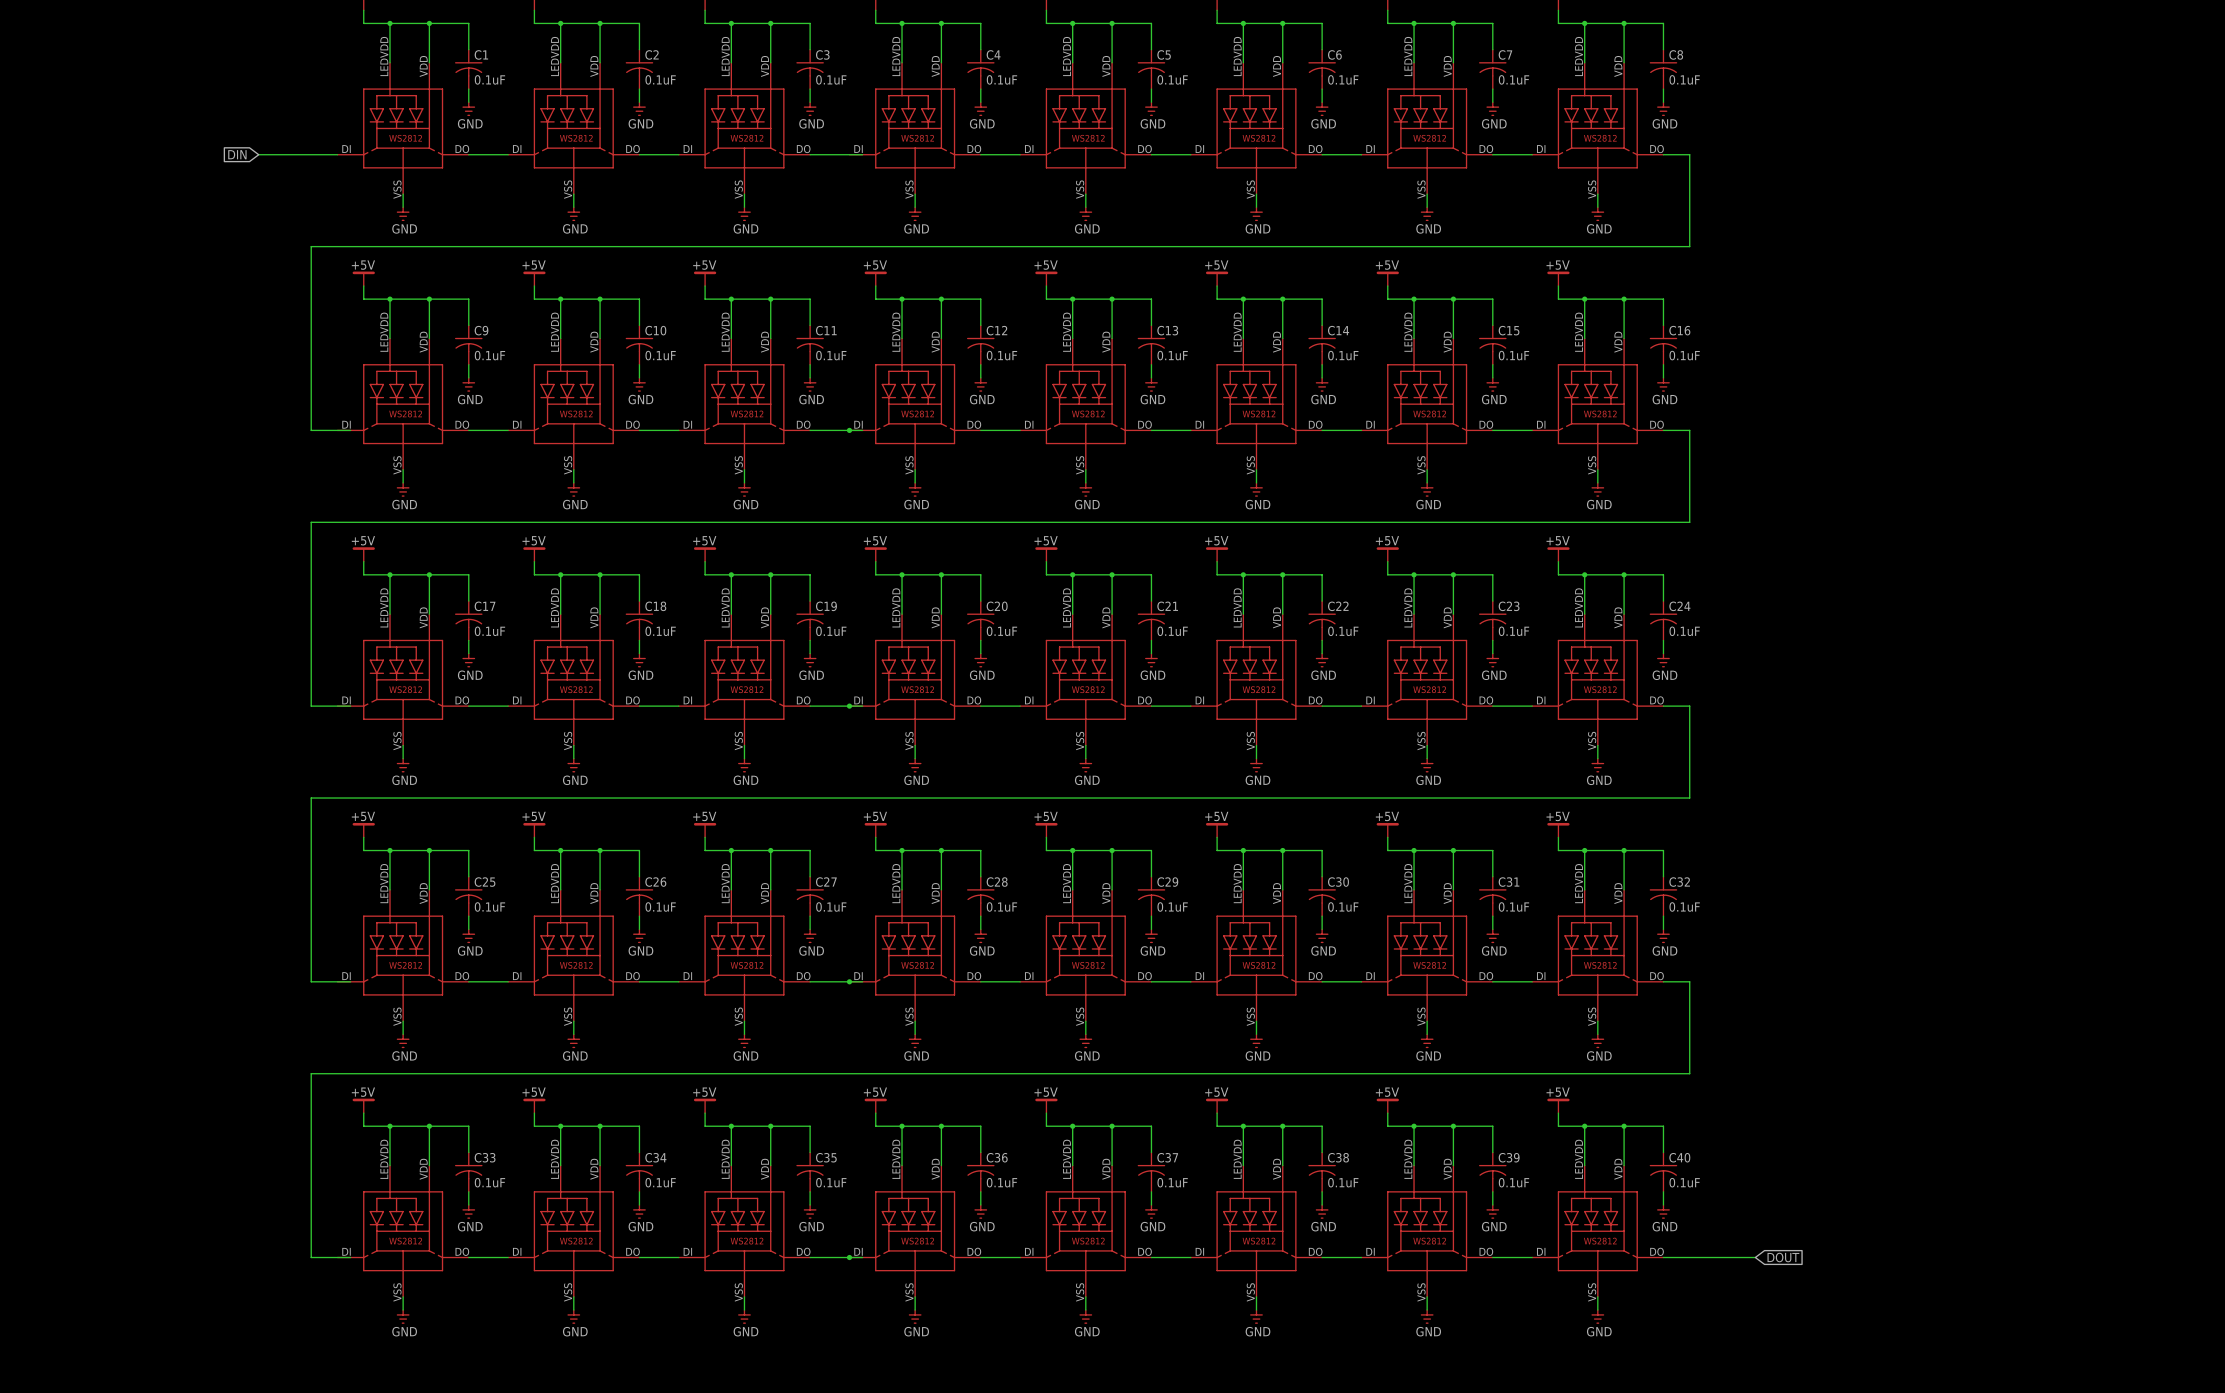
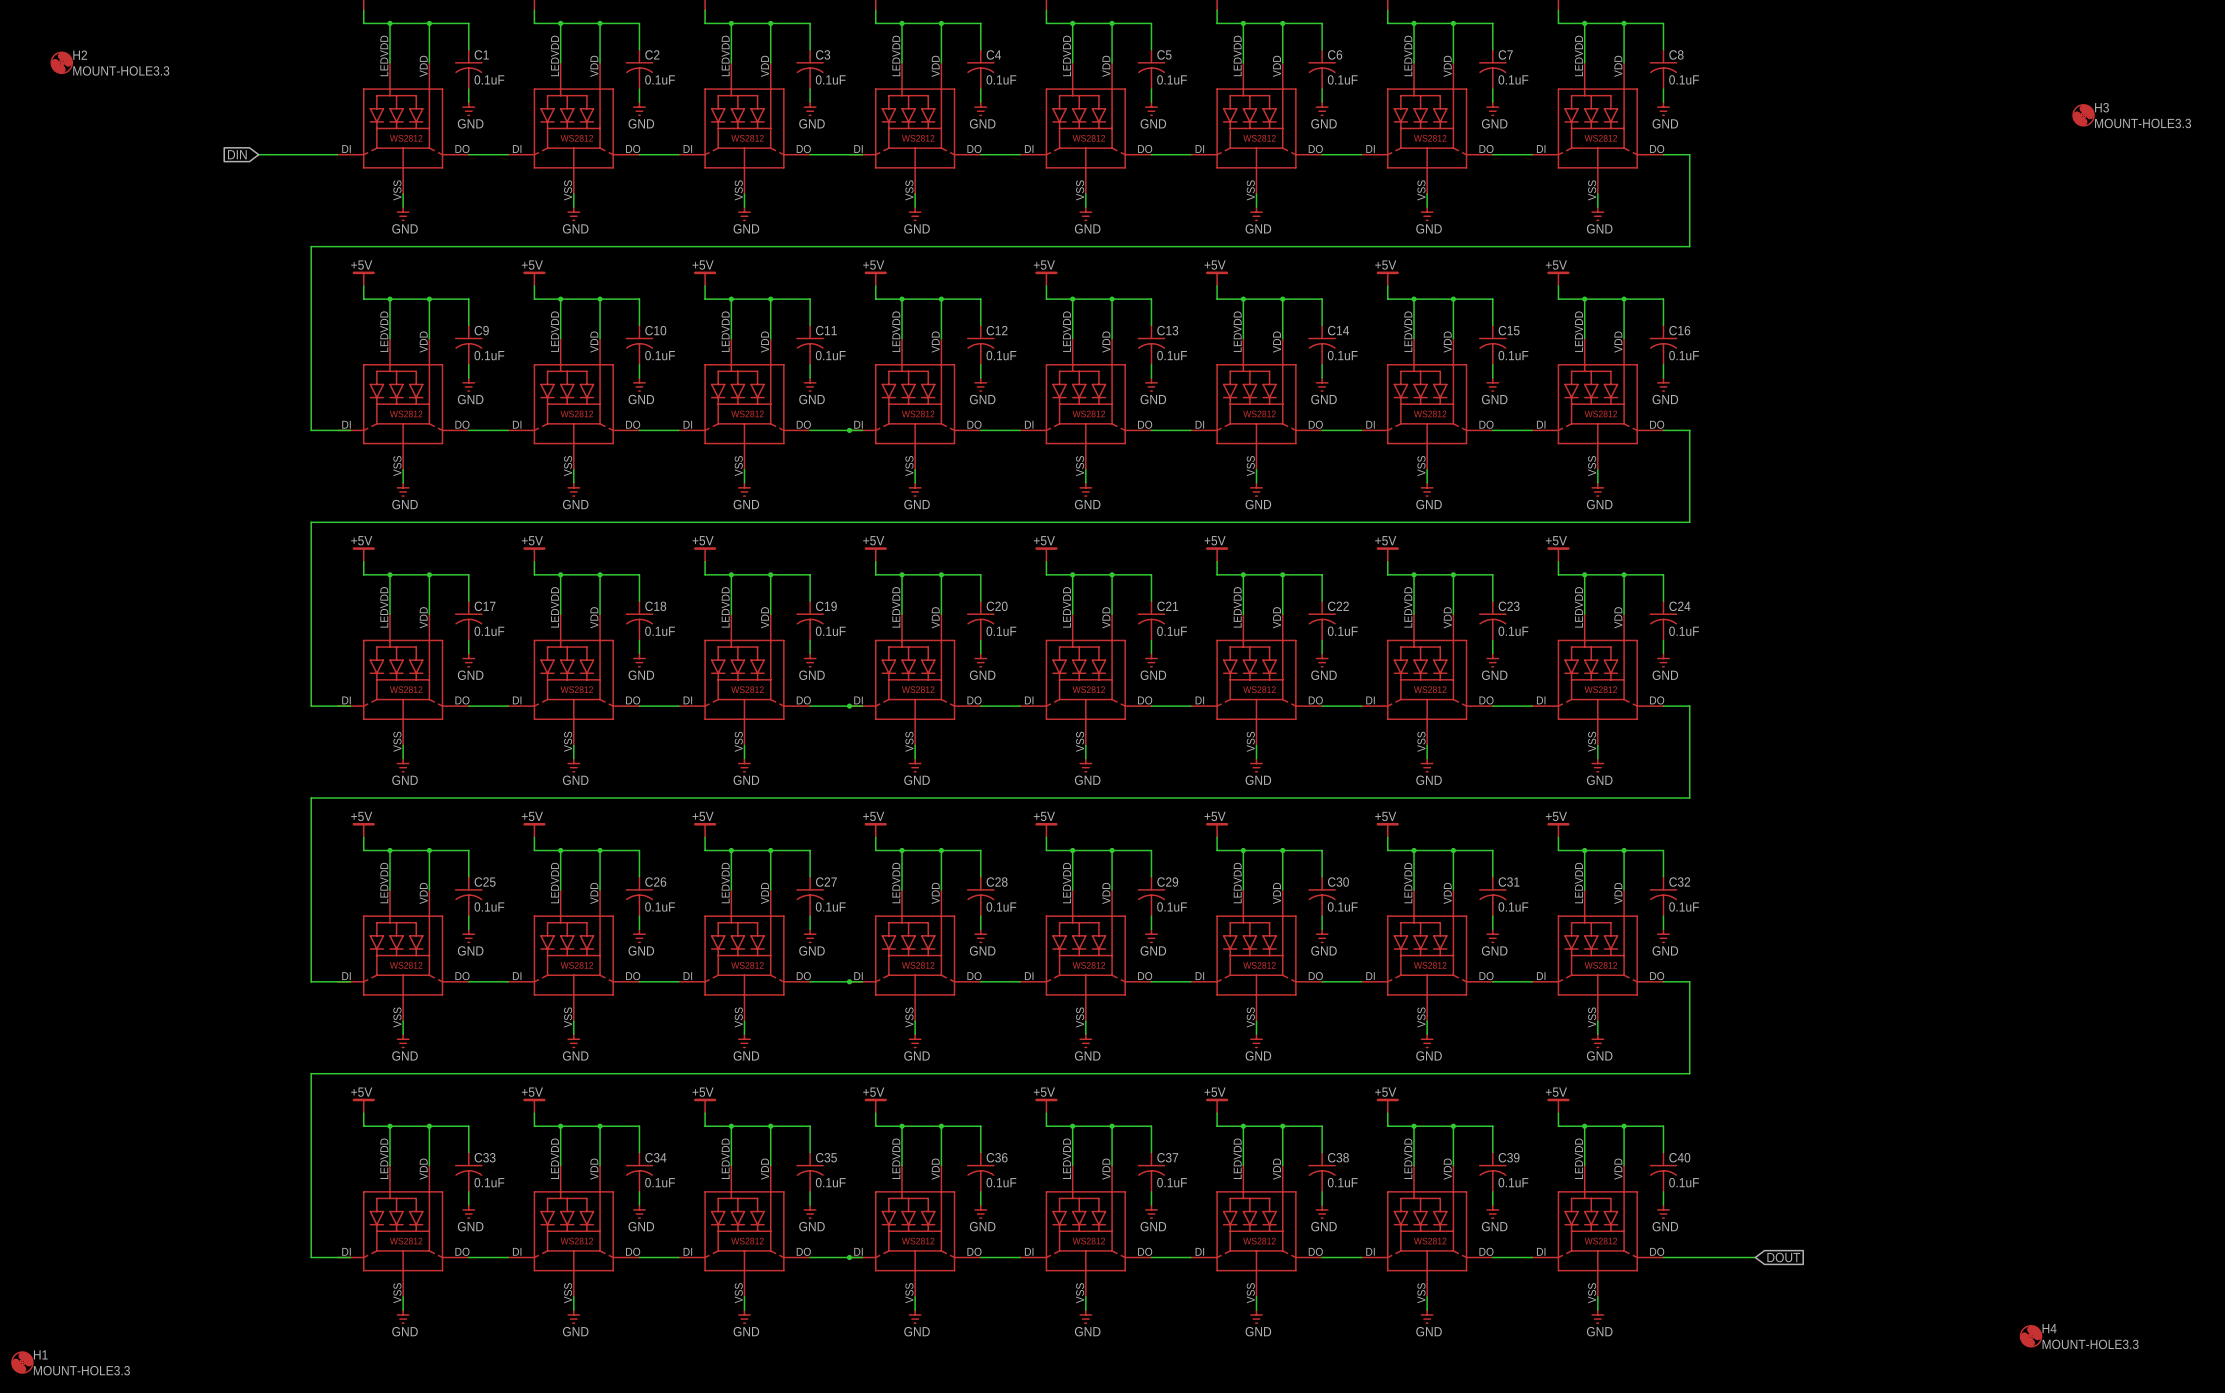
H2: none -> MOUNT-HOLE3.3 (61, 62)
H3: none -> MOUNT-HOLE3.3 (2083, 115)
H4: none -> MOUNT-HOLE3.3 (2031, 1336)
H1: none -> MOUNT-HOLE3.3 (22, 1362)

